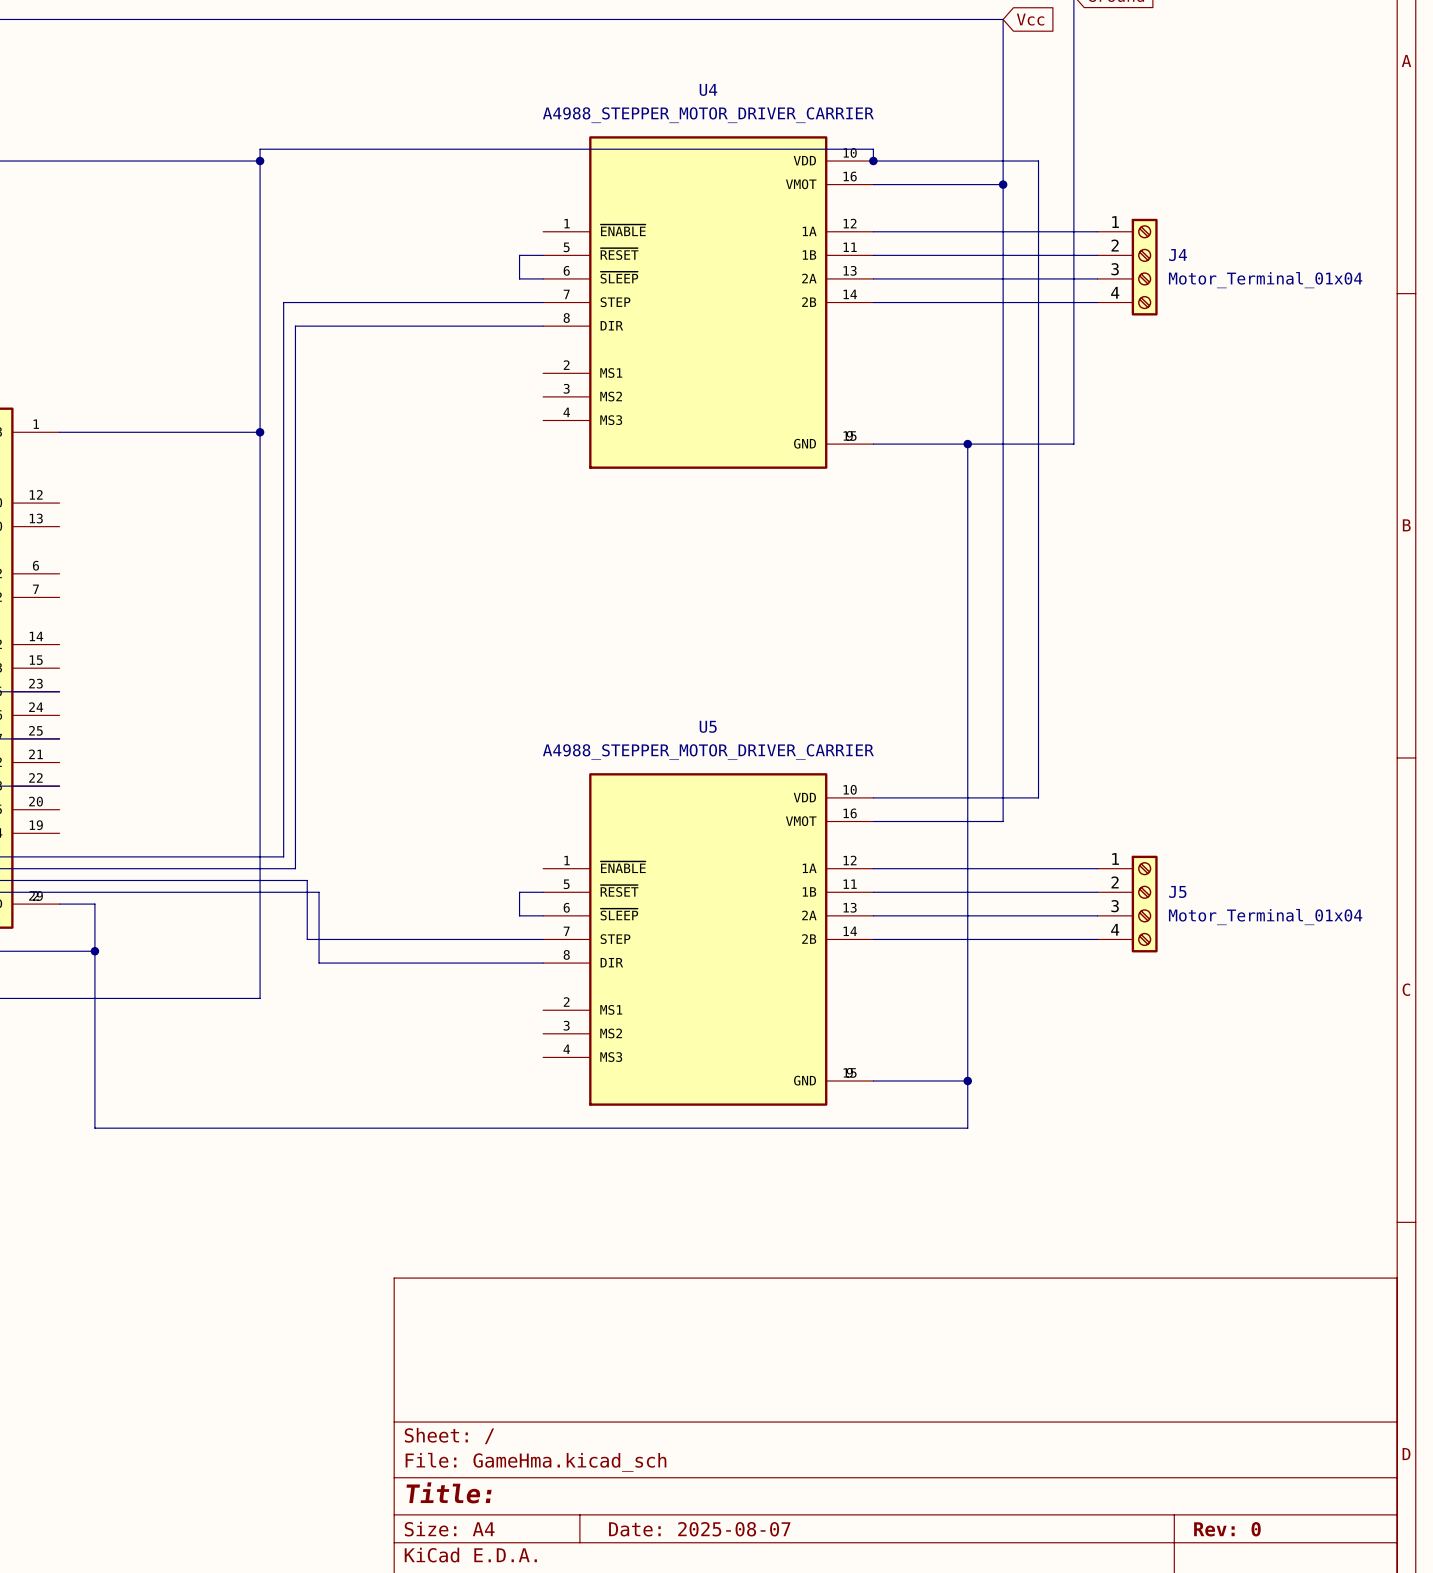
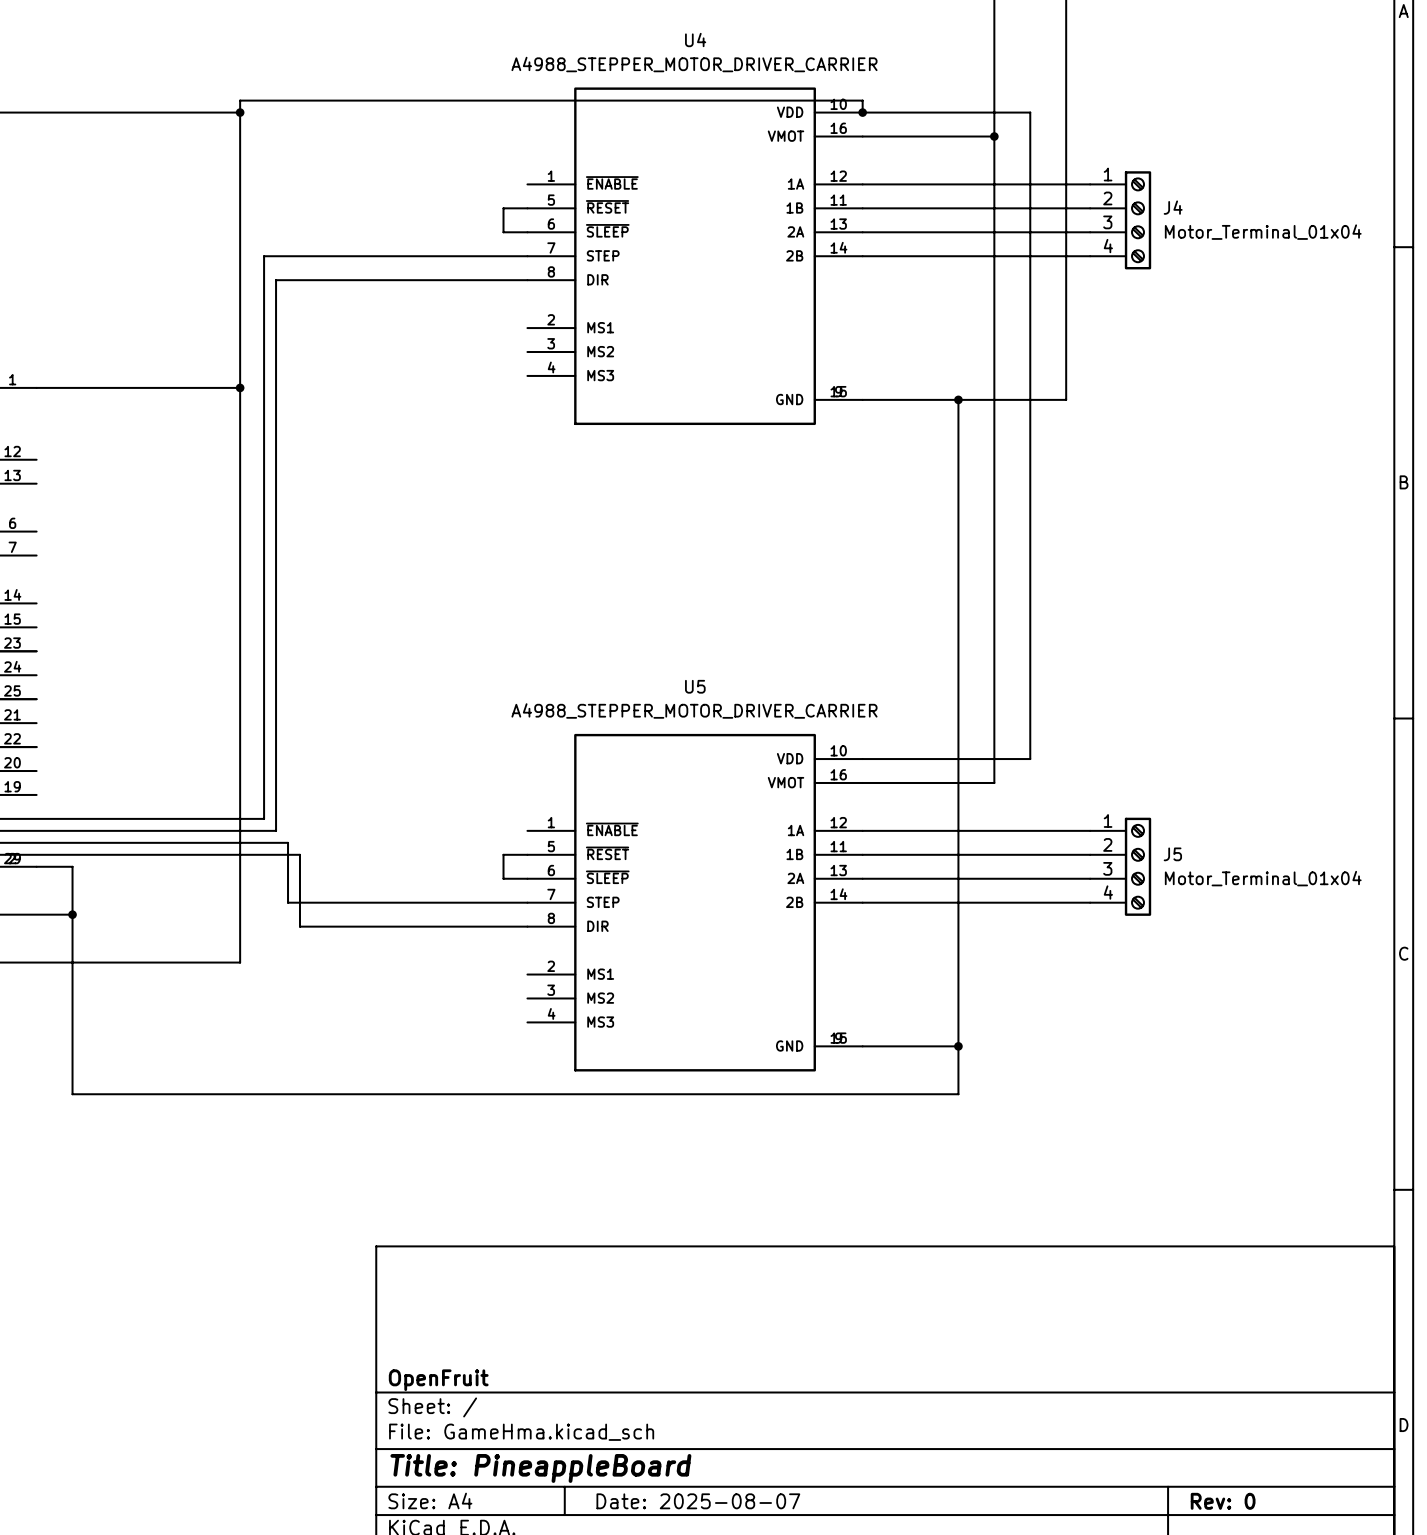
title block: none -> OpenFruit (438, 1380)
title block: Title: (449, 1492) -> Title: PineappleBoard (540, 1468)

